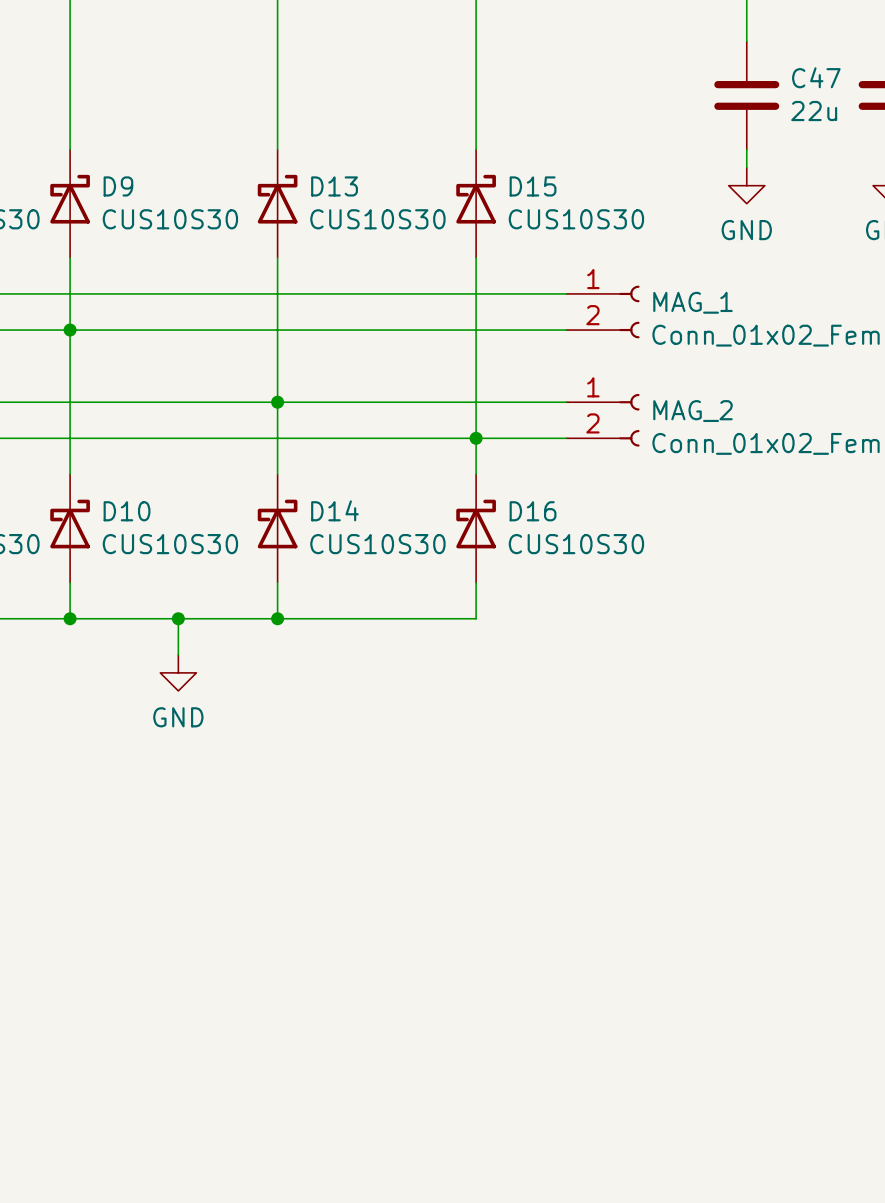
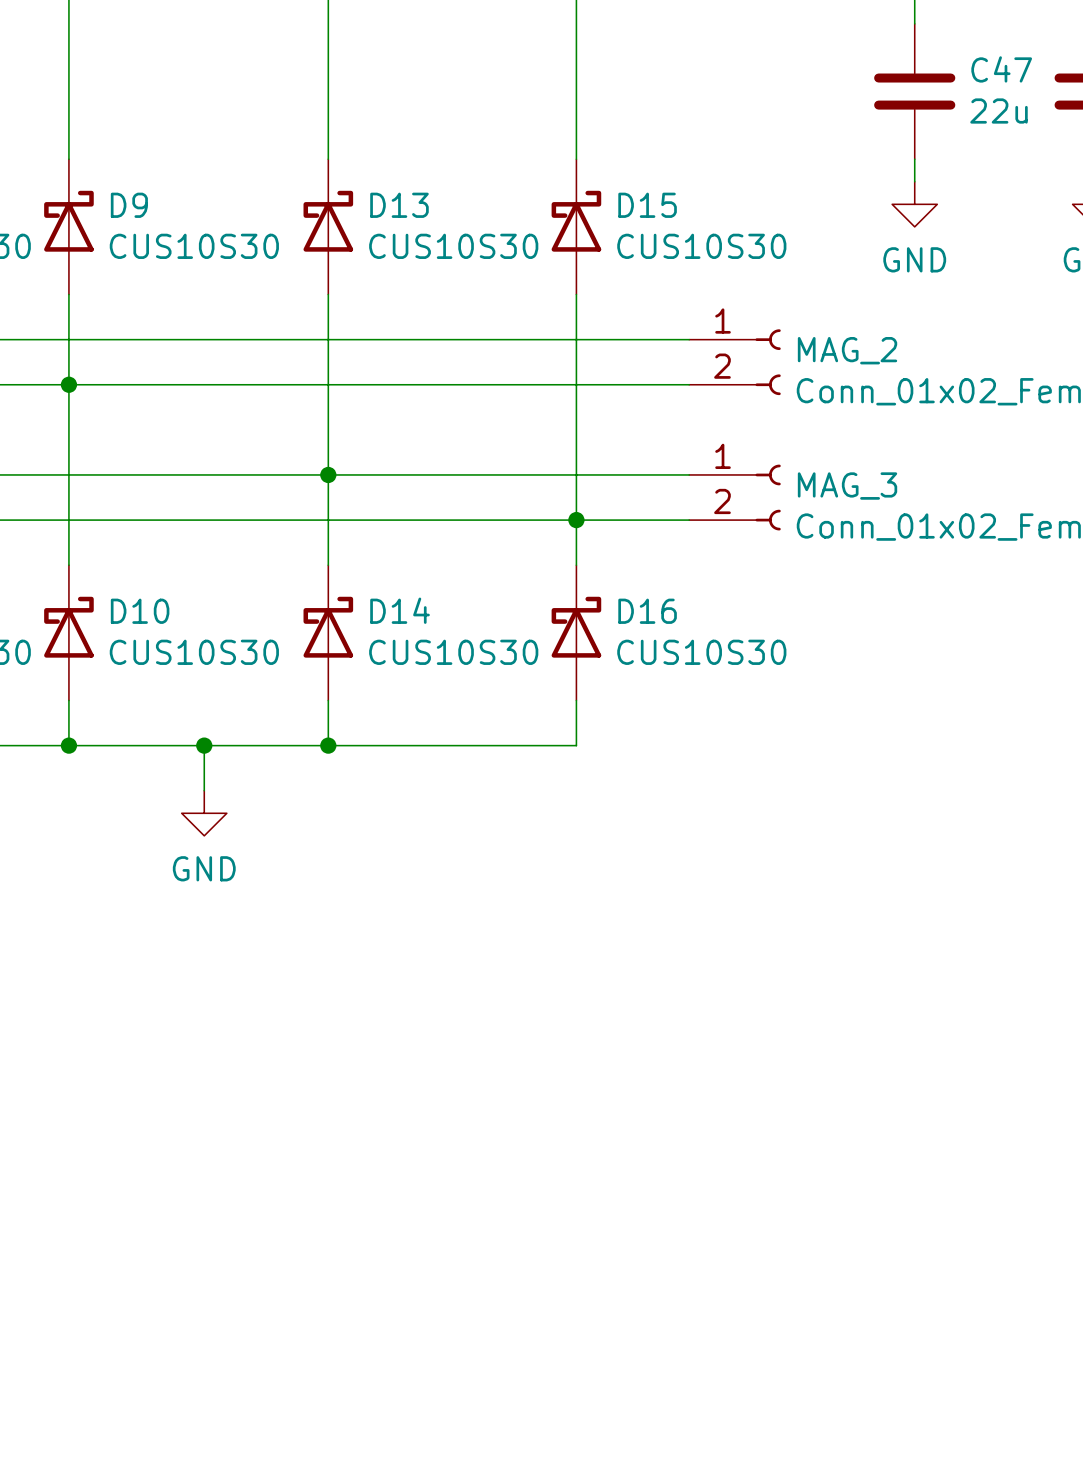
MAG_1 name: MAG_1 (692, 302) -> MAG_2 (847, 350)
MAG_2 name: MAG_2 (692, 411) -> MAG_3 (847, 486)

